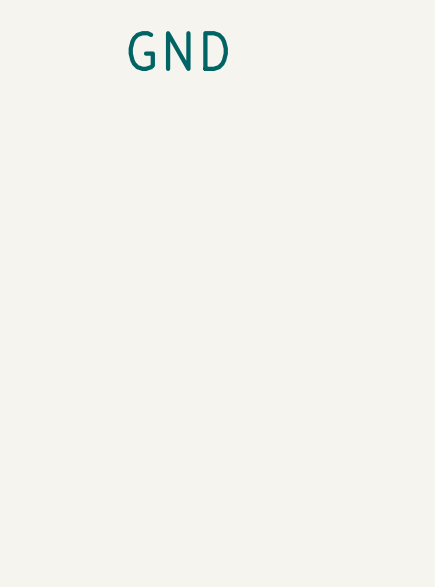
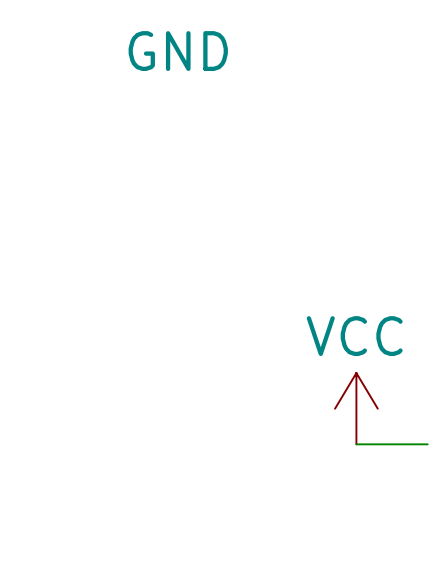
power symbol: none -> VCC (356, 408)
wire: none -> (356, 444) (427, 444)

